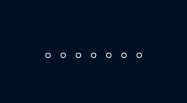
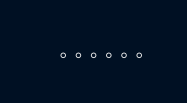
via: (48, 55) -> none

